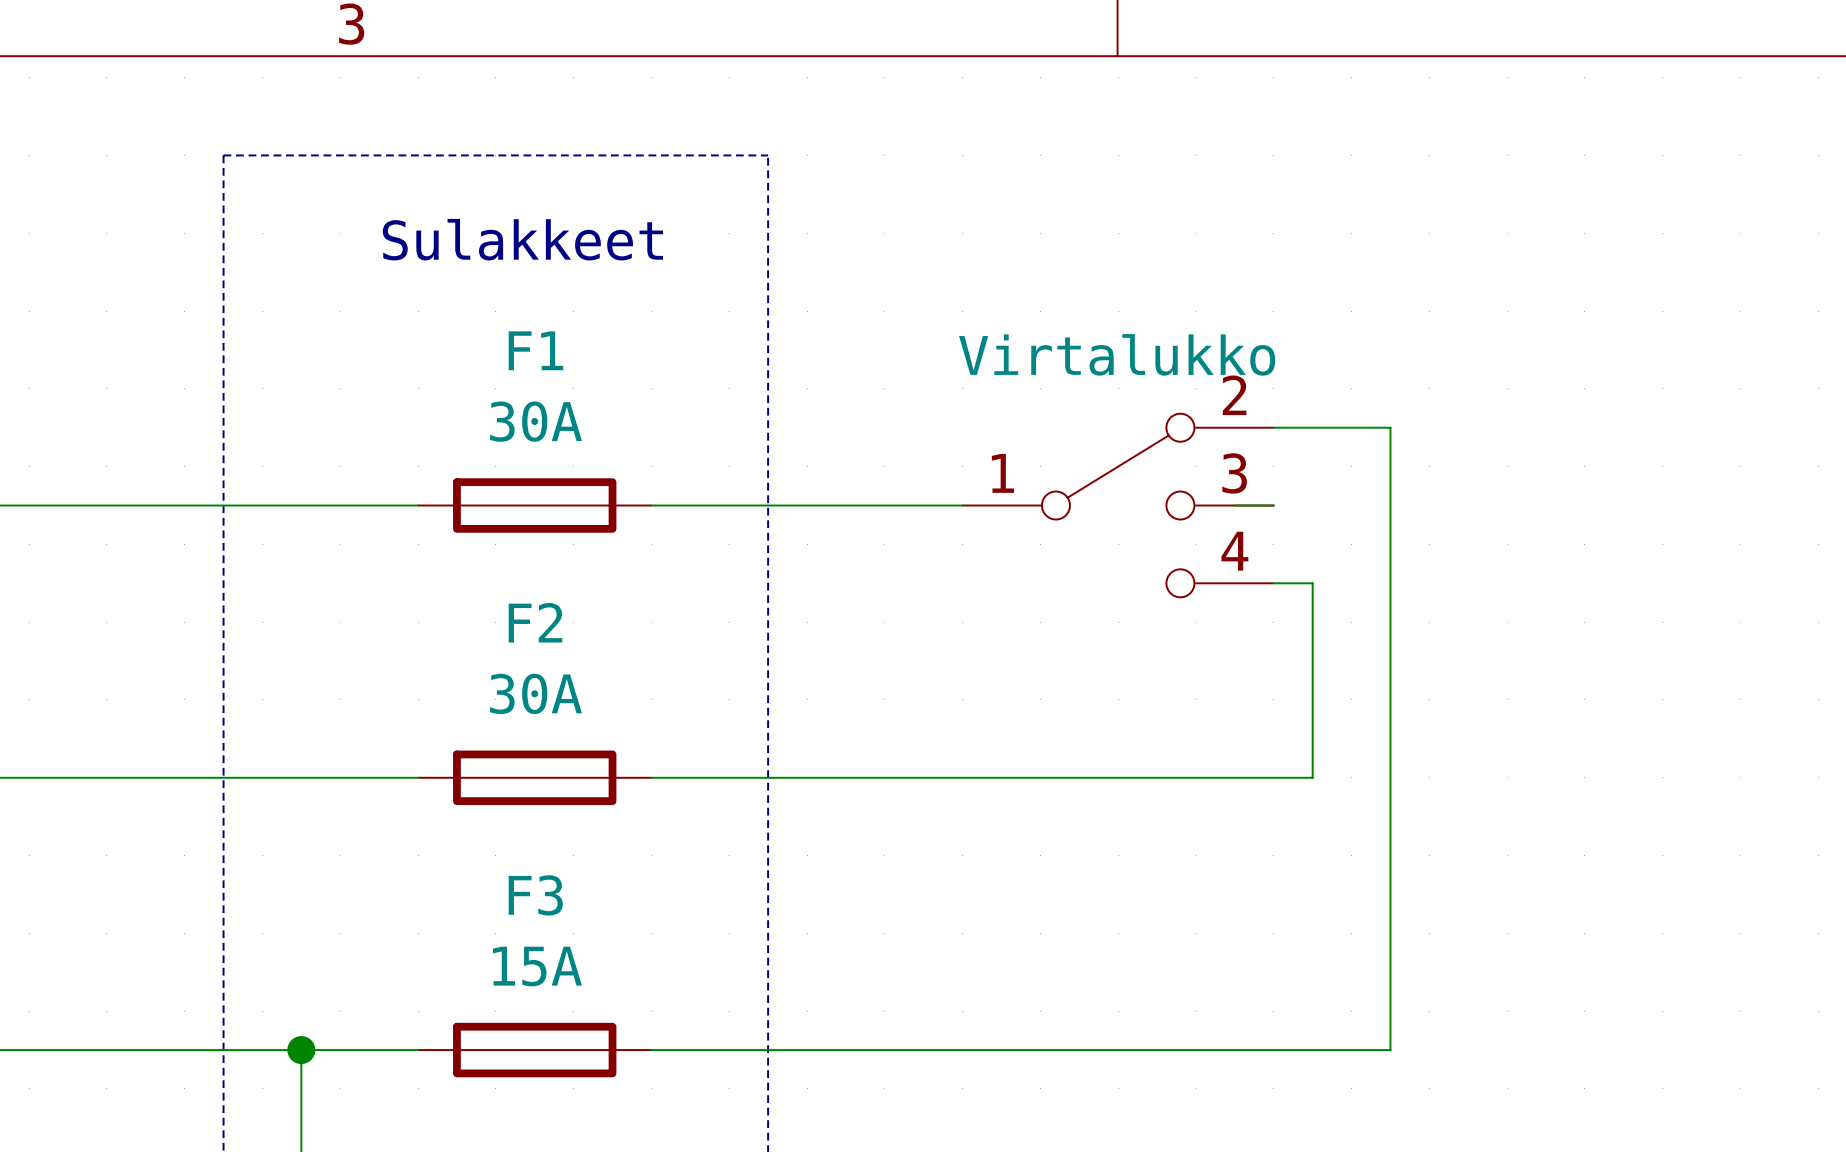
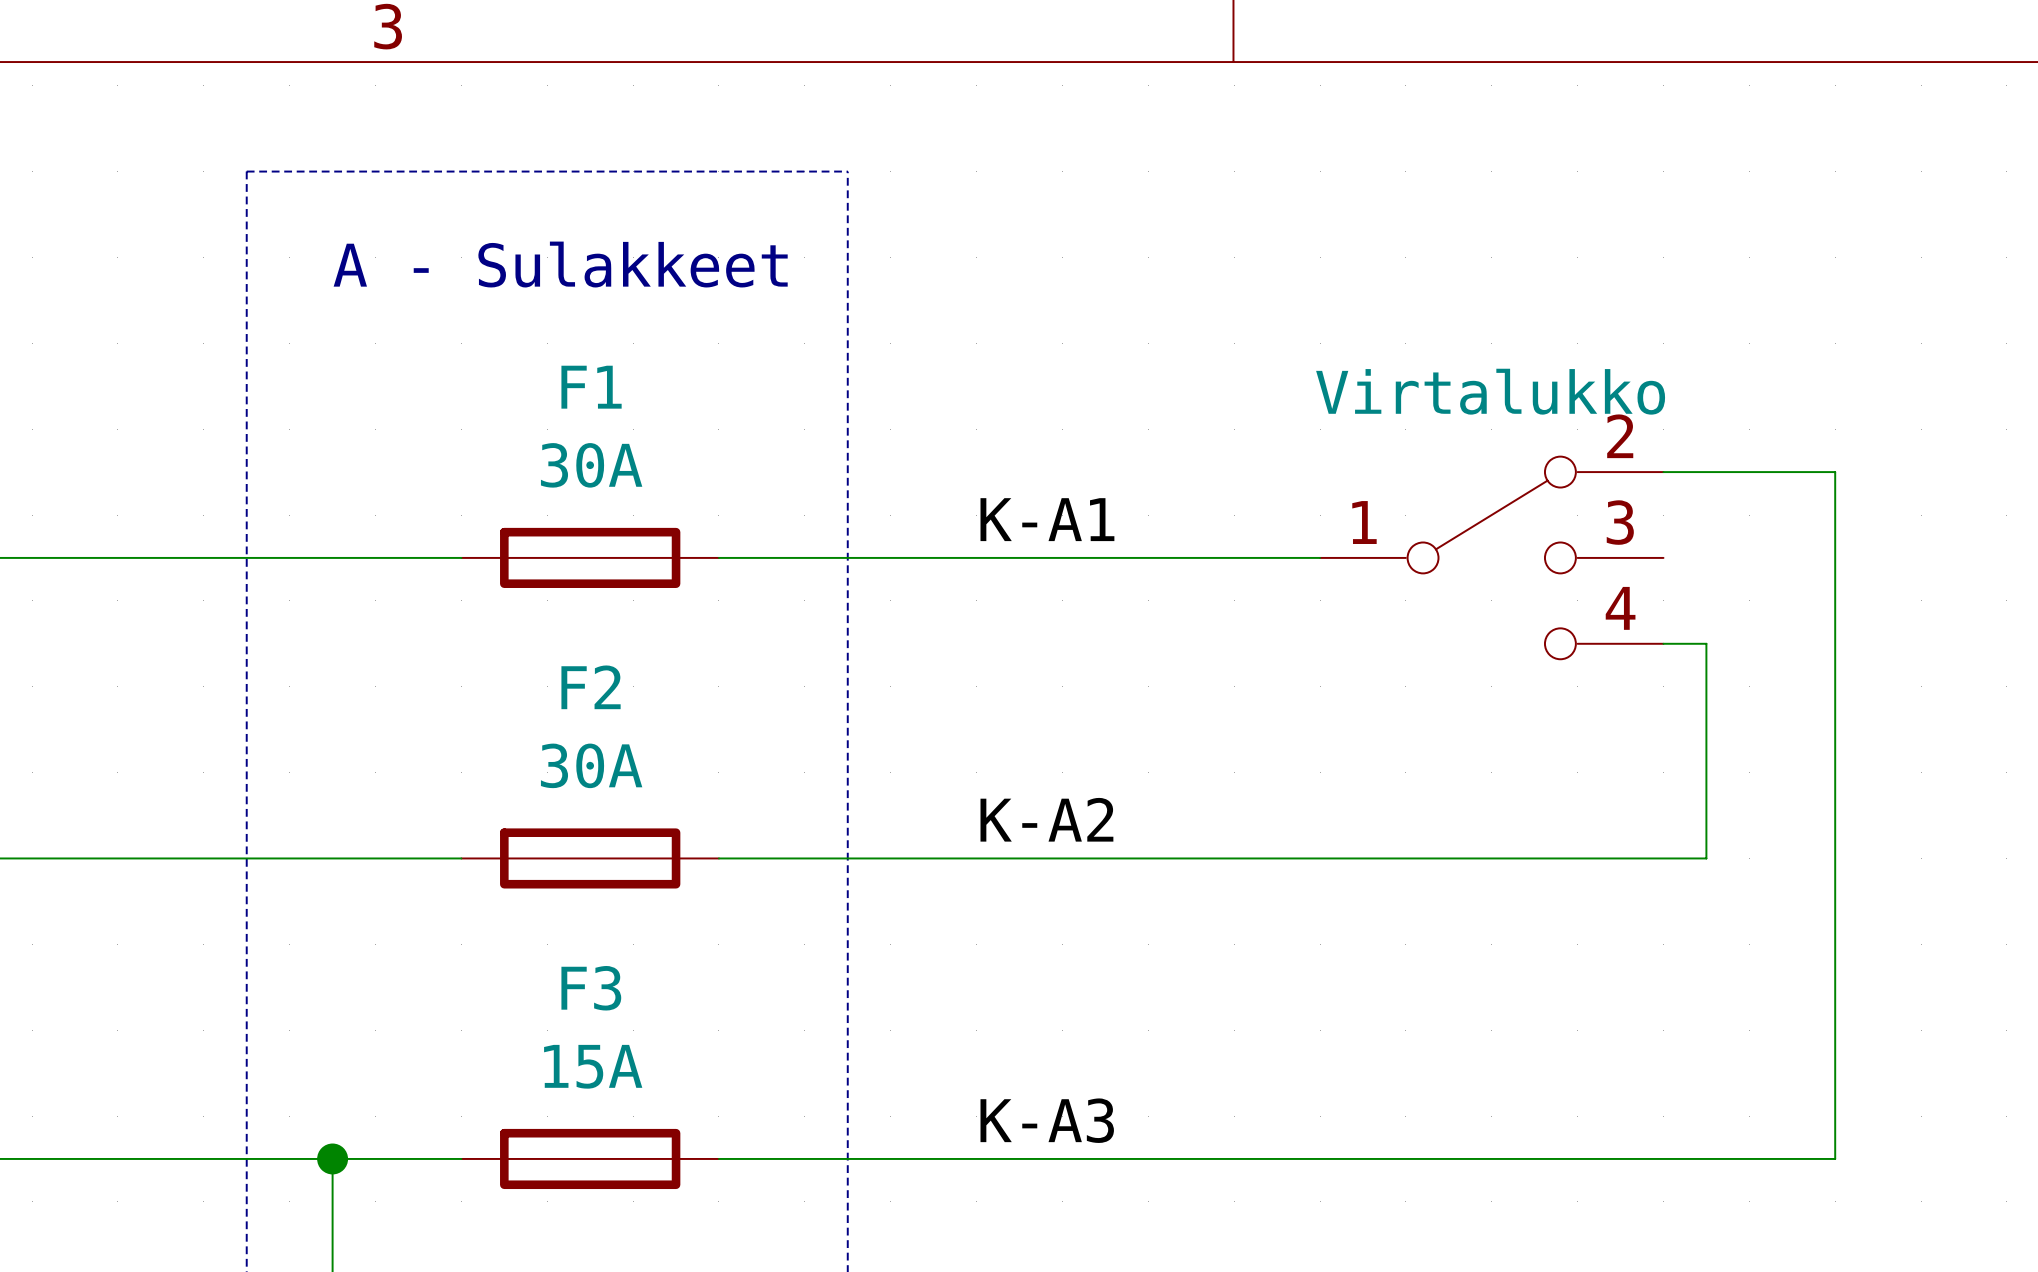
text: Sulakkeet (522, 239) -> A - Sulakkeet (560, 264)
wire: (1273, 427) (1390, 427) (1390, 1050) -> (1663, 472) (1835, 472) (1835, 1158) (1534, 1158)
label: none -> K-A1 (1047, 519)
wire: none -> (1062, 557) (1320, 557)
Virtalukko position: (1118, 505) -> (1491, 557)
wire: (1273, 583) (1312, 583) (1312, 777) -> (1663, 643) (1706, 643) (1706, 858) (1448, 858)
label: none -> K-A2 (1046, 819)
label: none -> K-A3 (1047, 1120)

